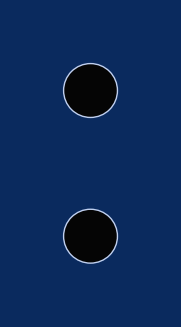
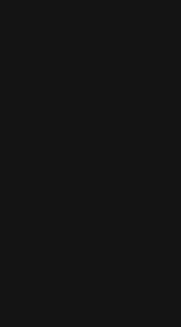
part: (90, 90) -> none
part: (90, 236) -> none

